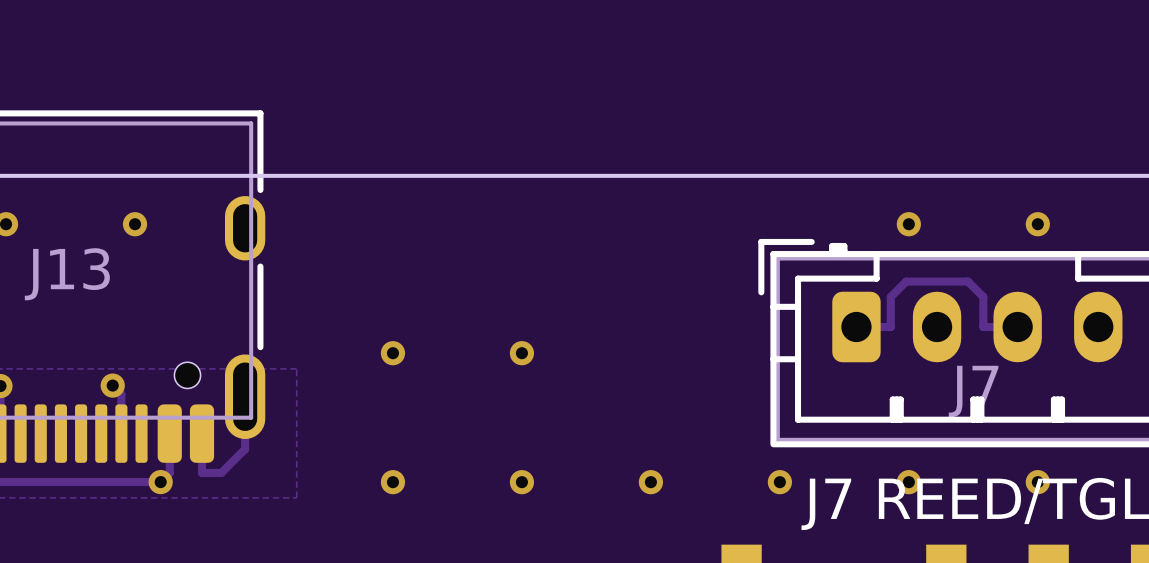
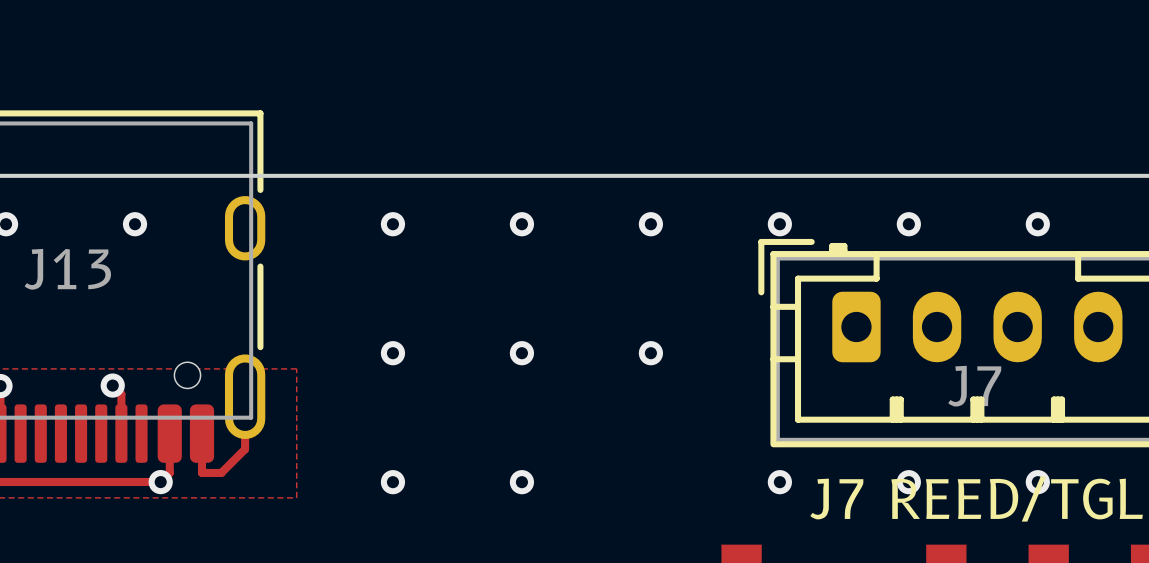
via: none -> (392, 224)
via: none -> (521, 224)
via: none -> (650, 224)
via: none -> (779, 224)
track: (856, 327) (890, 327) (890, 296) (906, 281) (967, 281) (983, 296) (983, 327) (1017, 327) -> none
via: none -> (650, 353)
via: (650, 482) -> none

